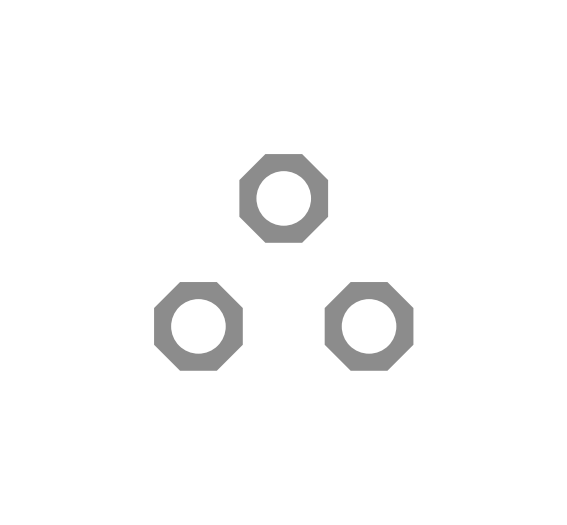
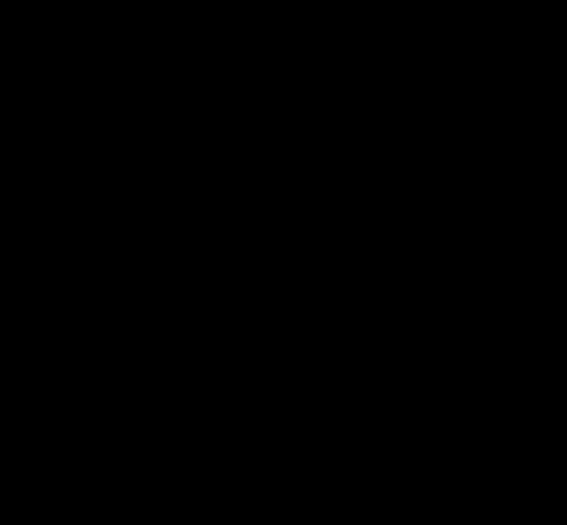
part: (283, 262) -> none

